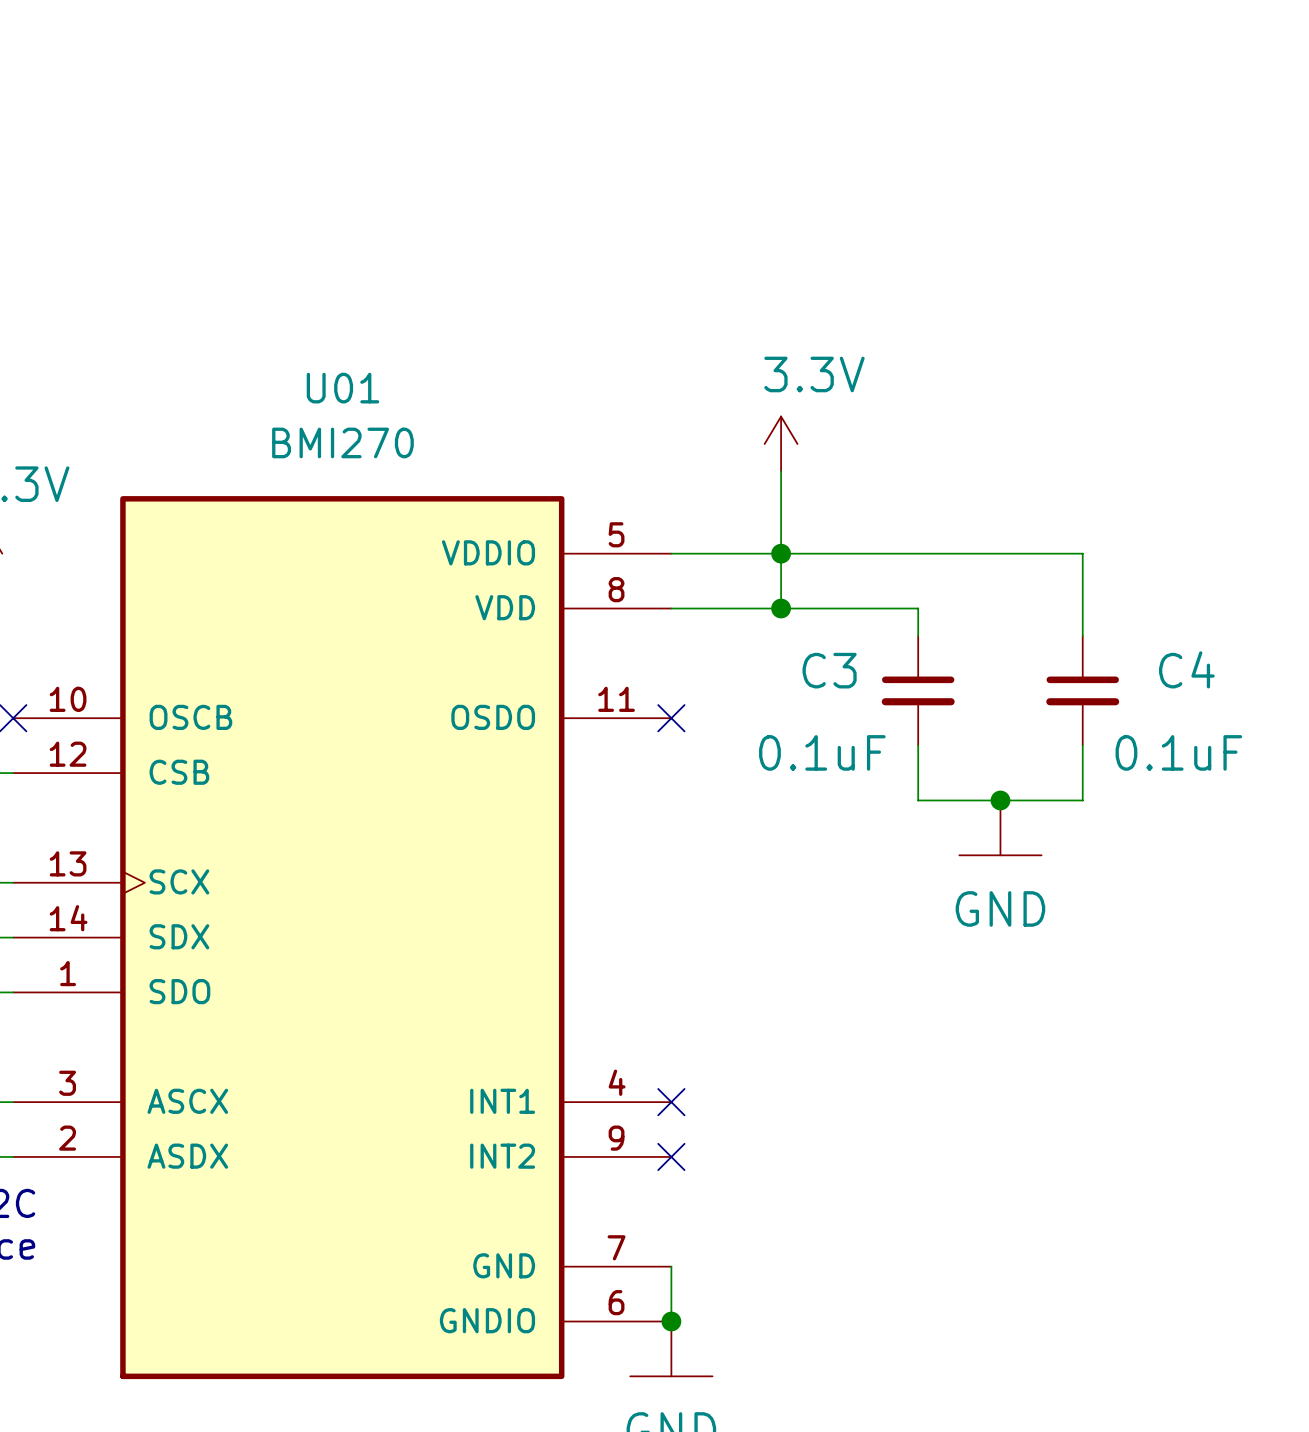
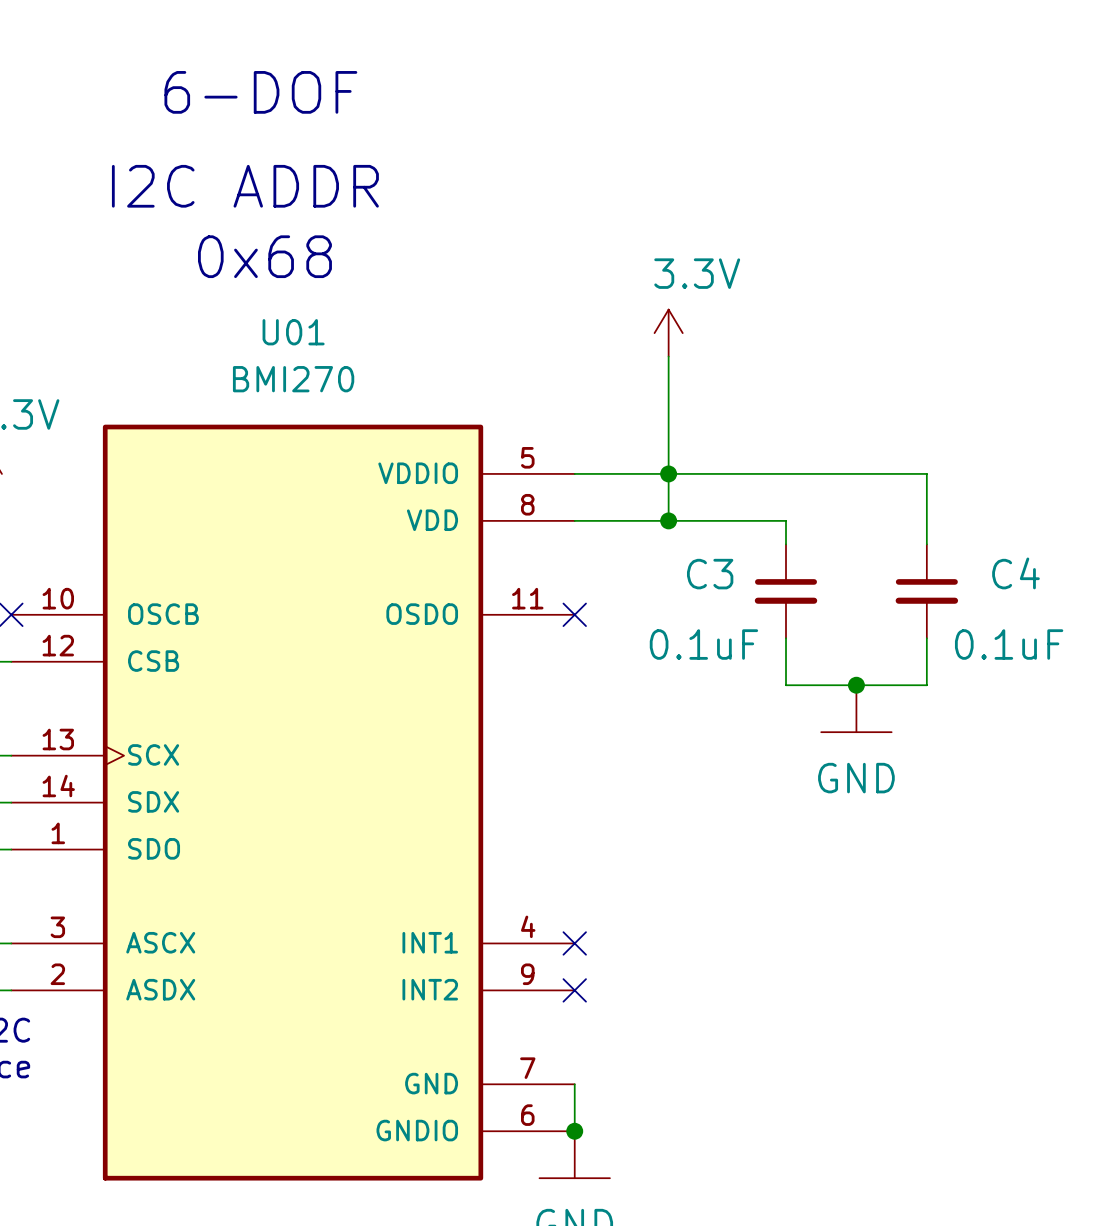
text: none -> 6-DOF (260, 92)
text: none -> I2C ADDR (245, 186)
text: none -> 0x68 (264, 256)
power symbol position: 3.3V (781, 443) -> 3.3V (668, 333)

